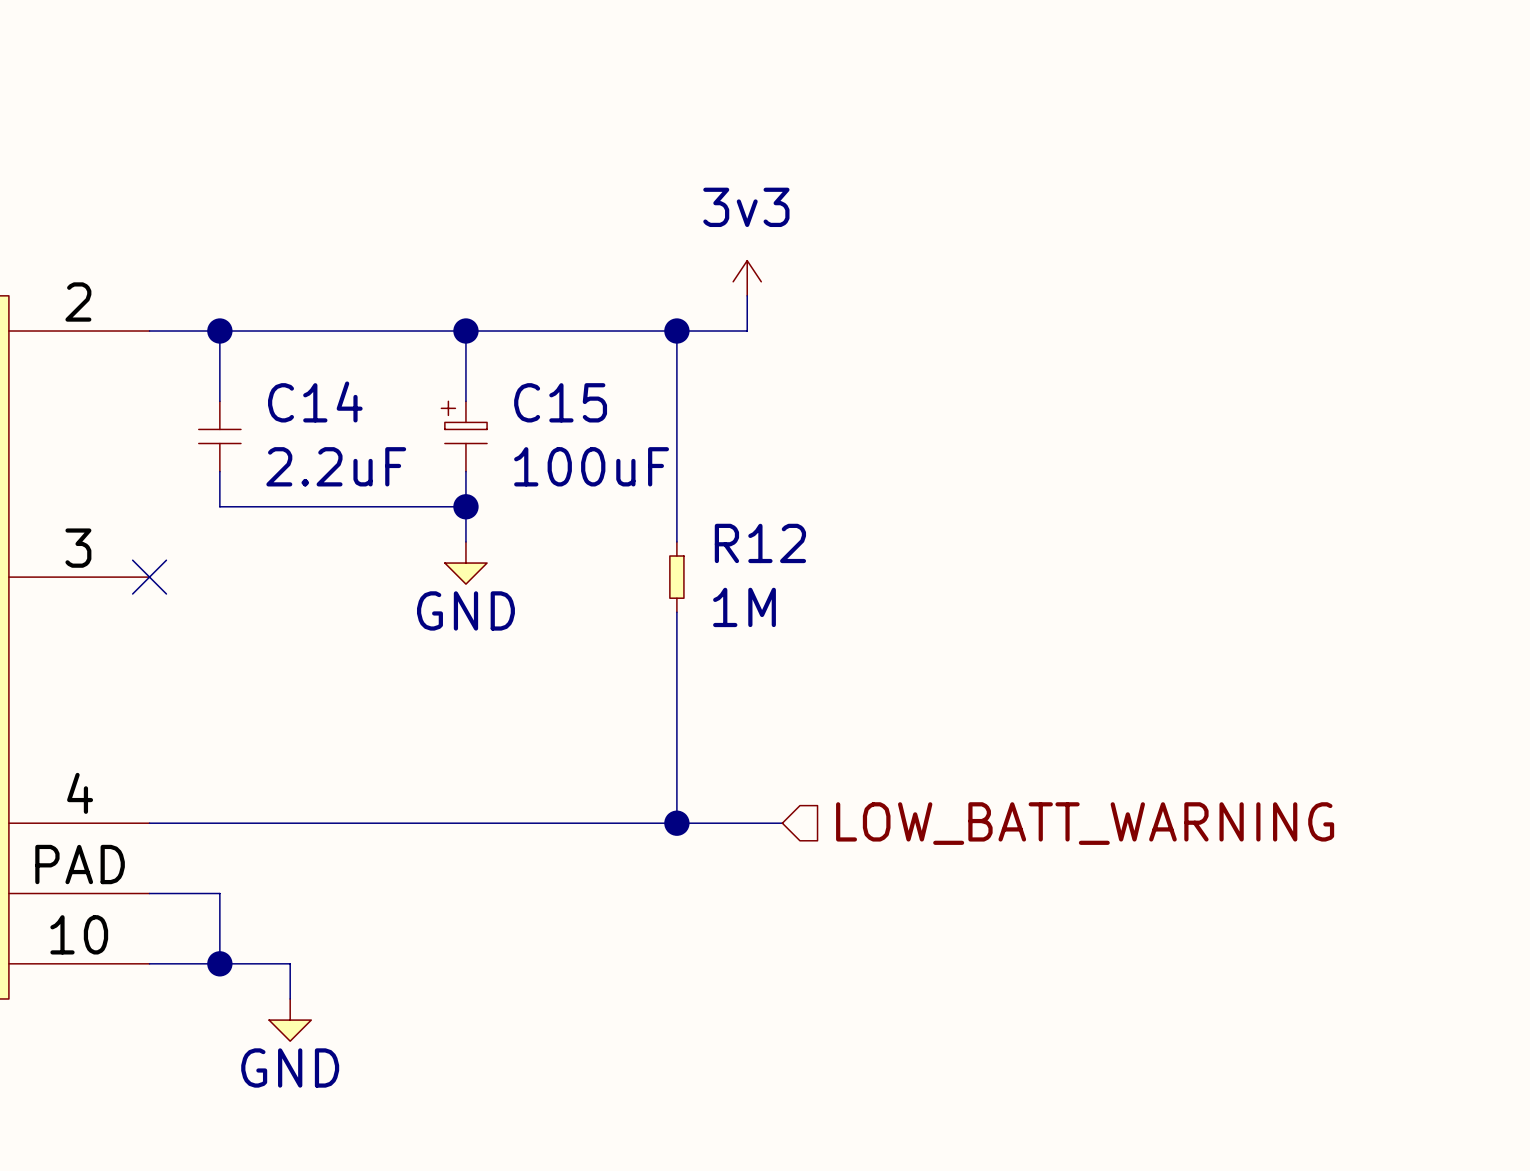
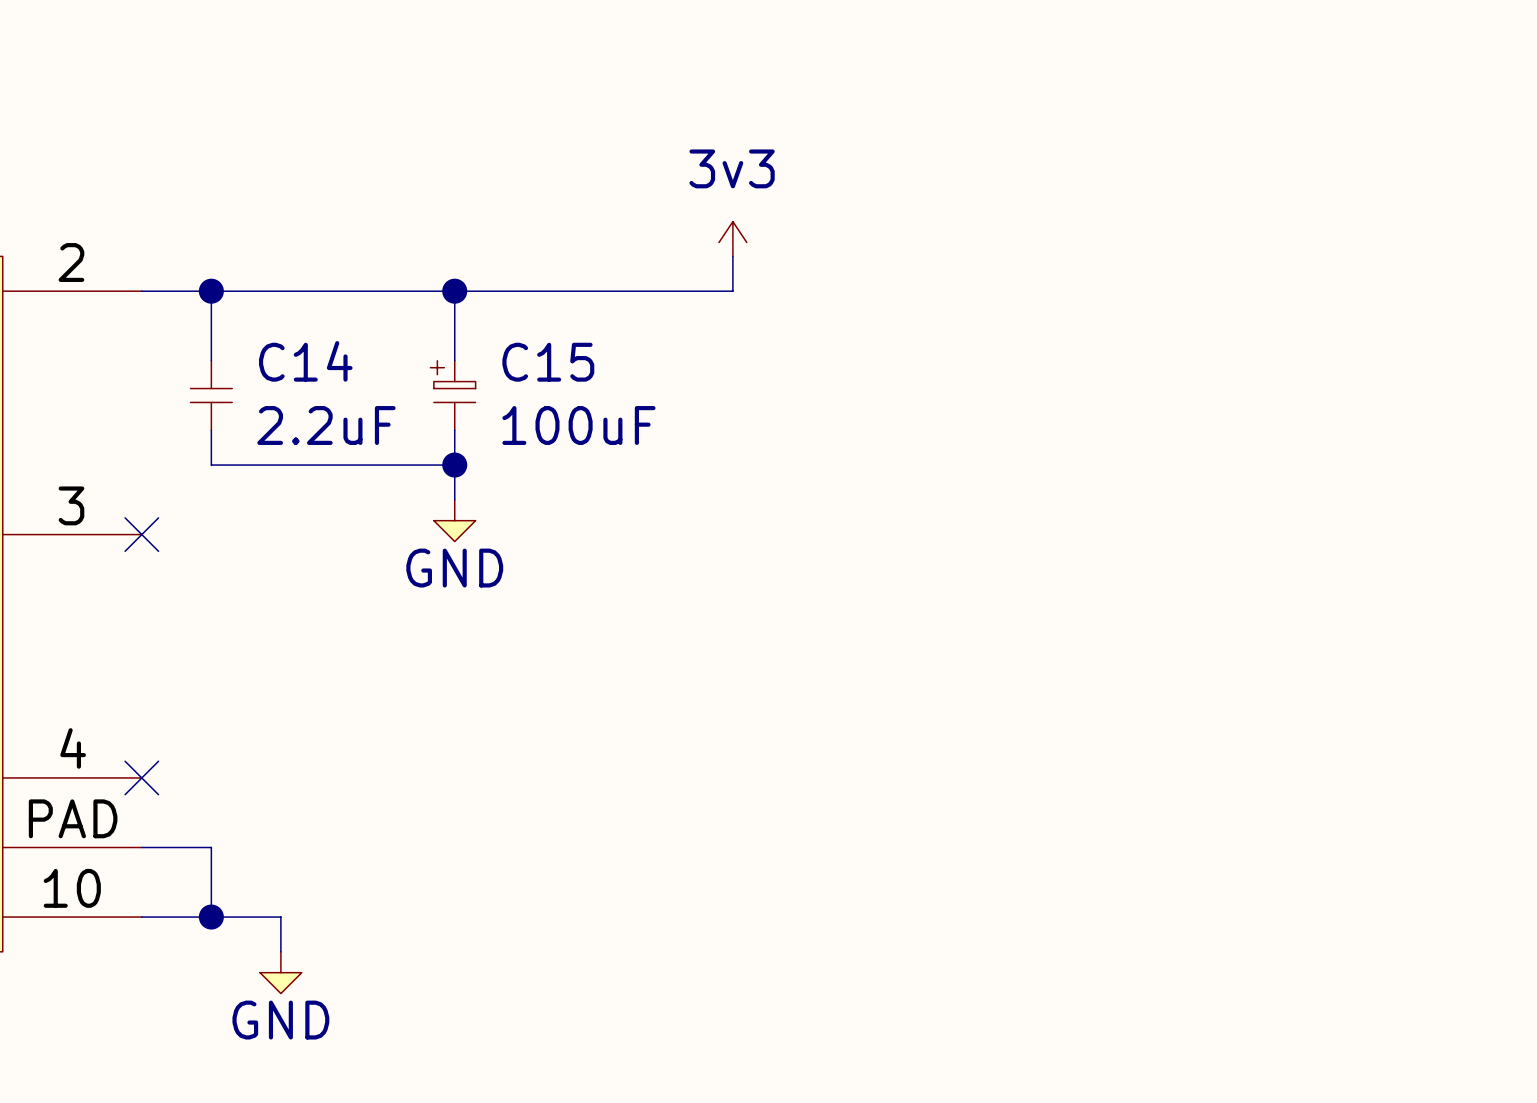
wire: (676, 331) (676, 541) -> none
junction: (676, 331) -> none
R12: 1M (676, 577) -> none
wire: (676, 612) (676, 823) -> none
wire: (149, 823) (782, 823) -> none
no-connect mark: none -> (141, 777)
junction: (676, 823) -> none
hierarchical label: LOW_BATT_WARNING (1085, 823) -> none

